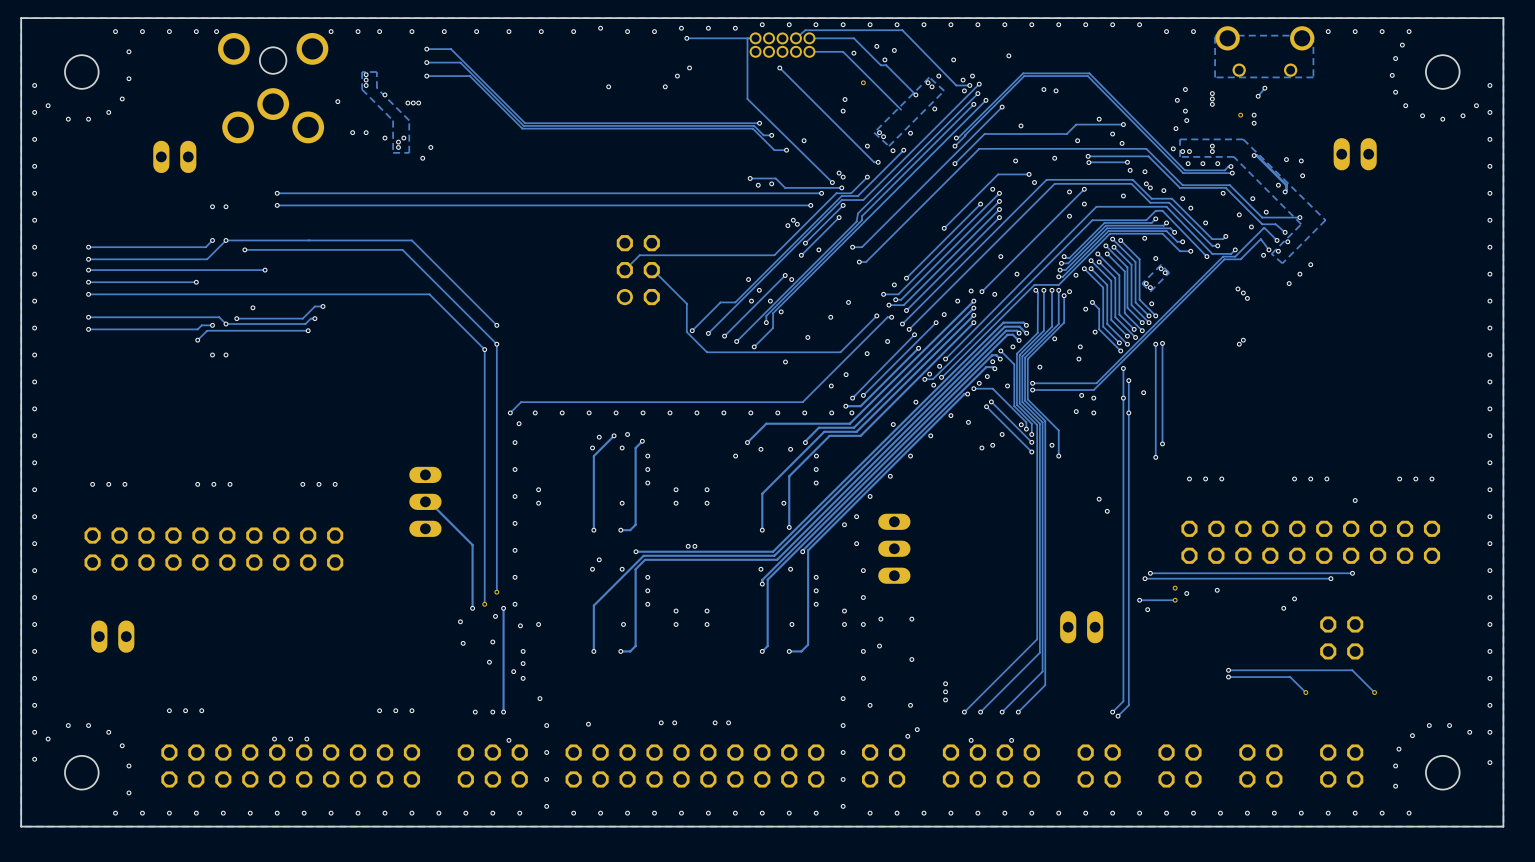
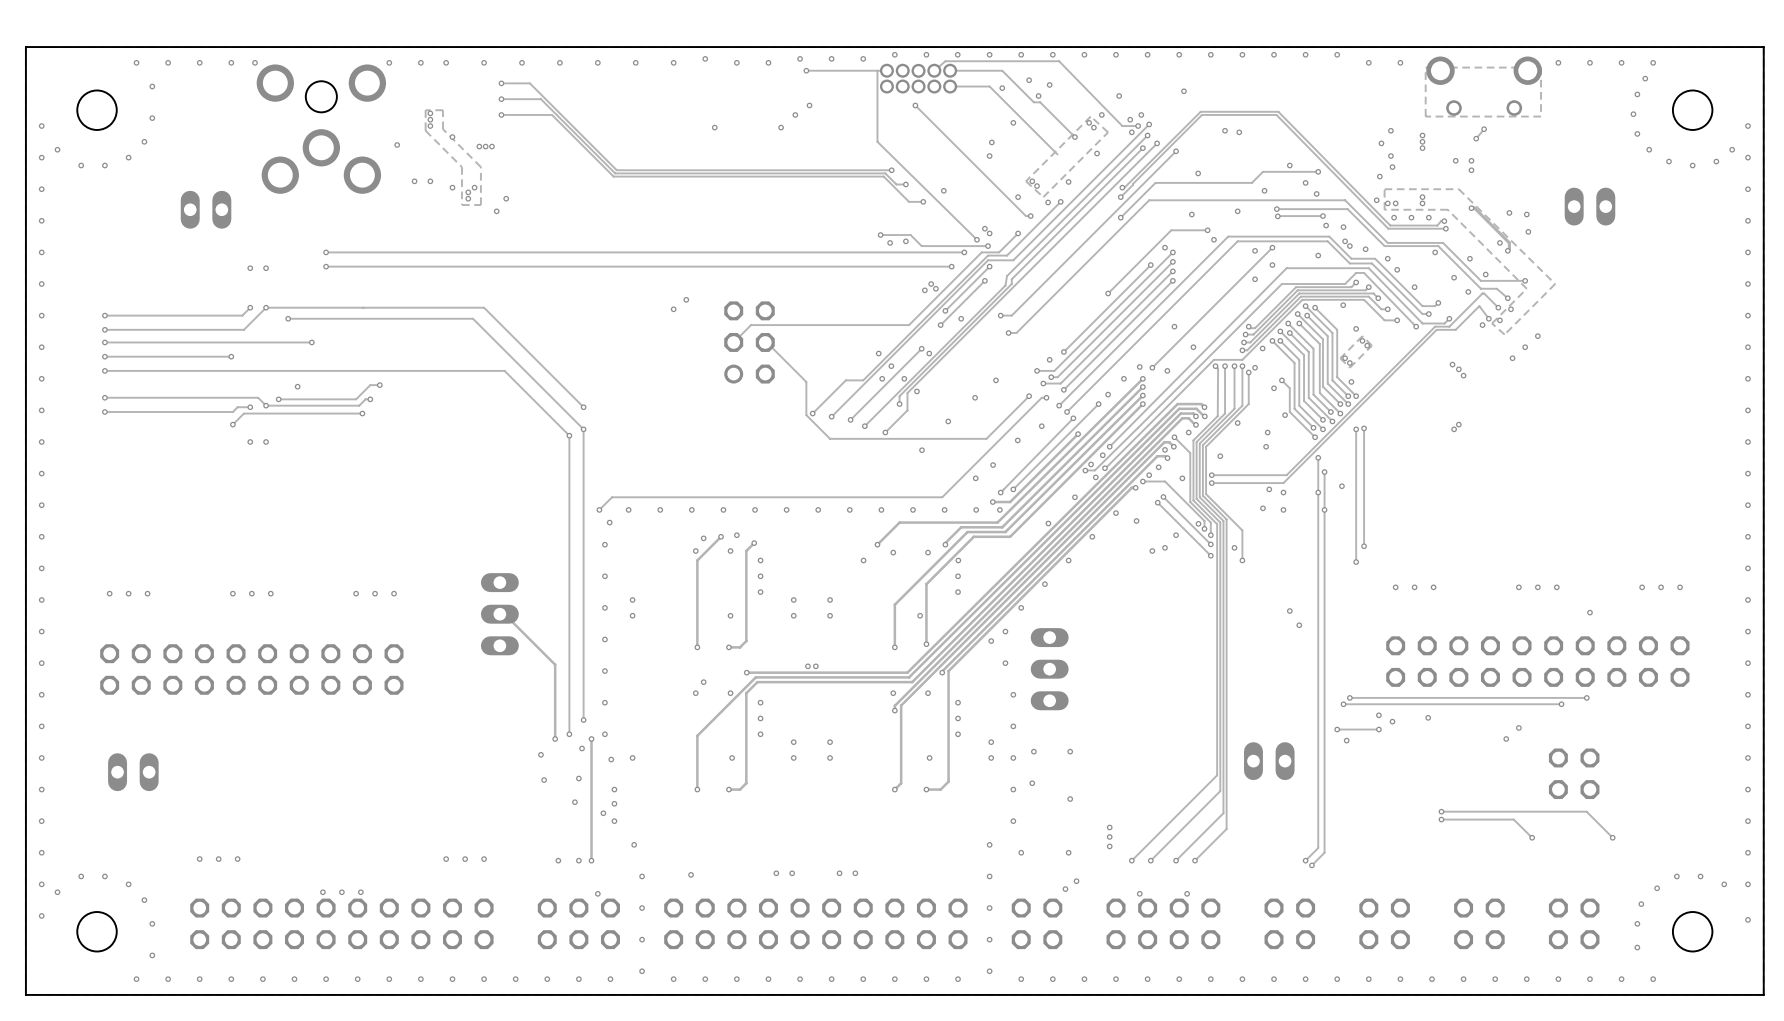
via: none -> (686, 299)
via: none -> (673, 309)

